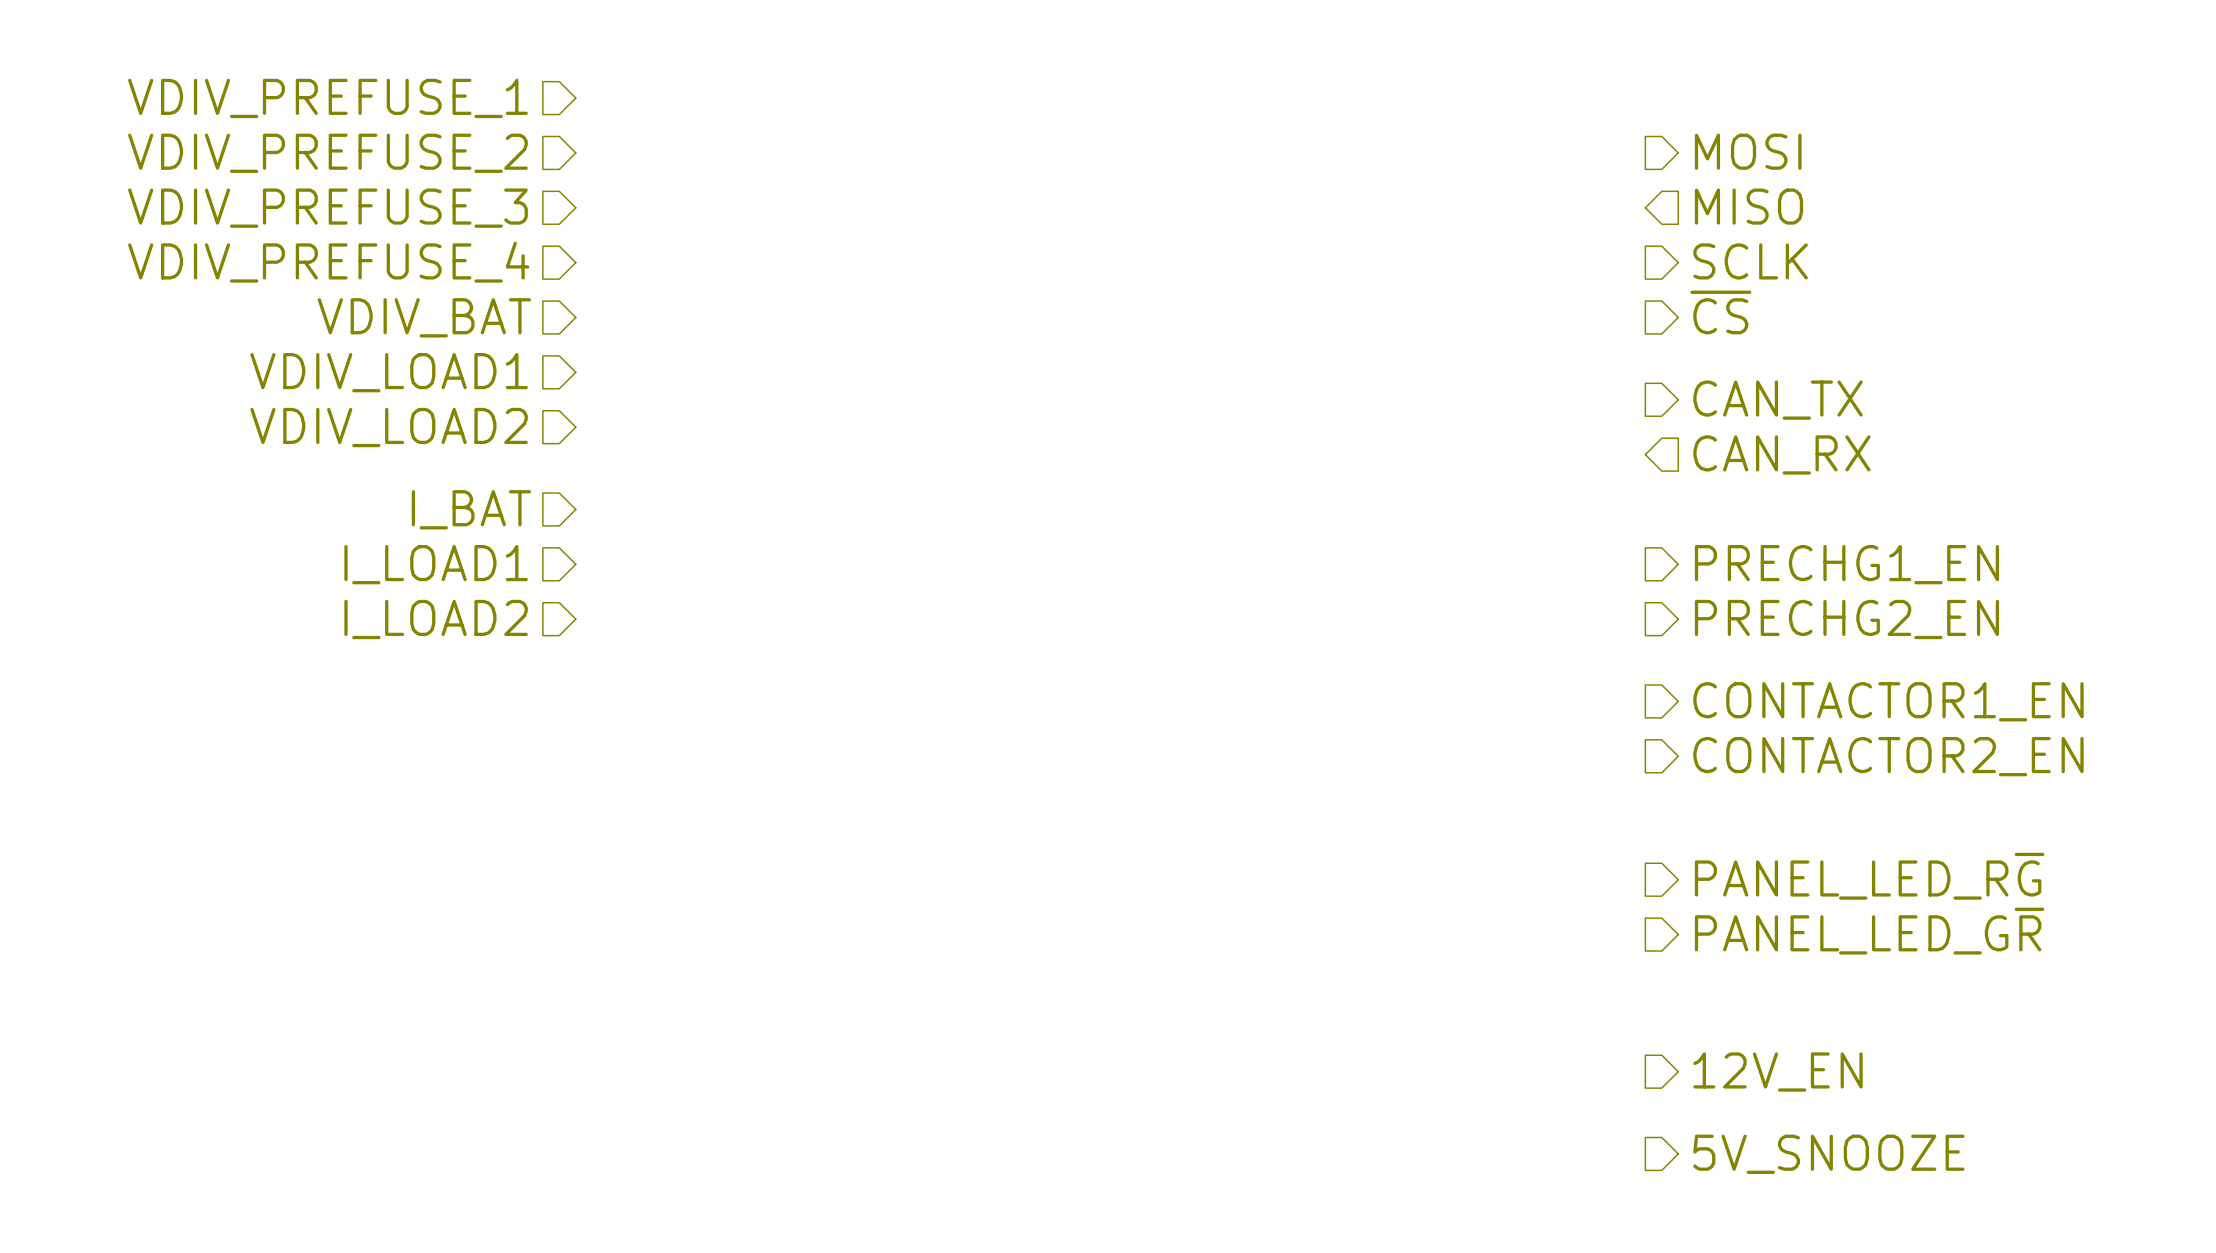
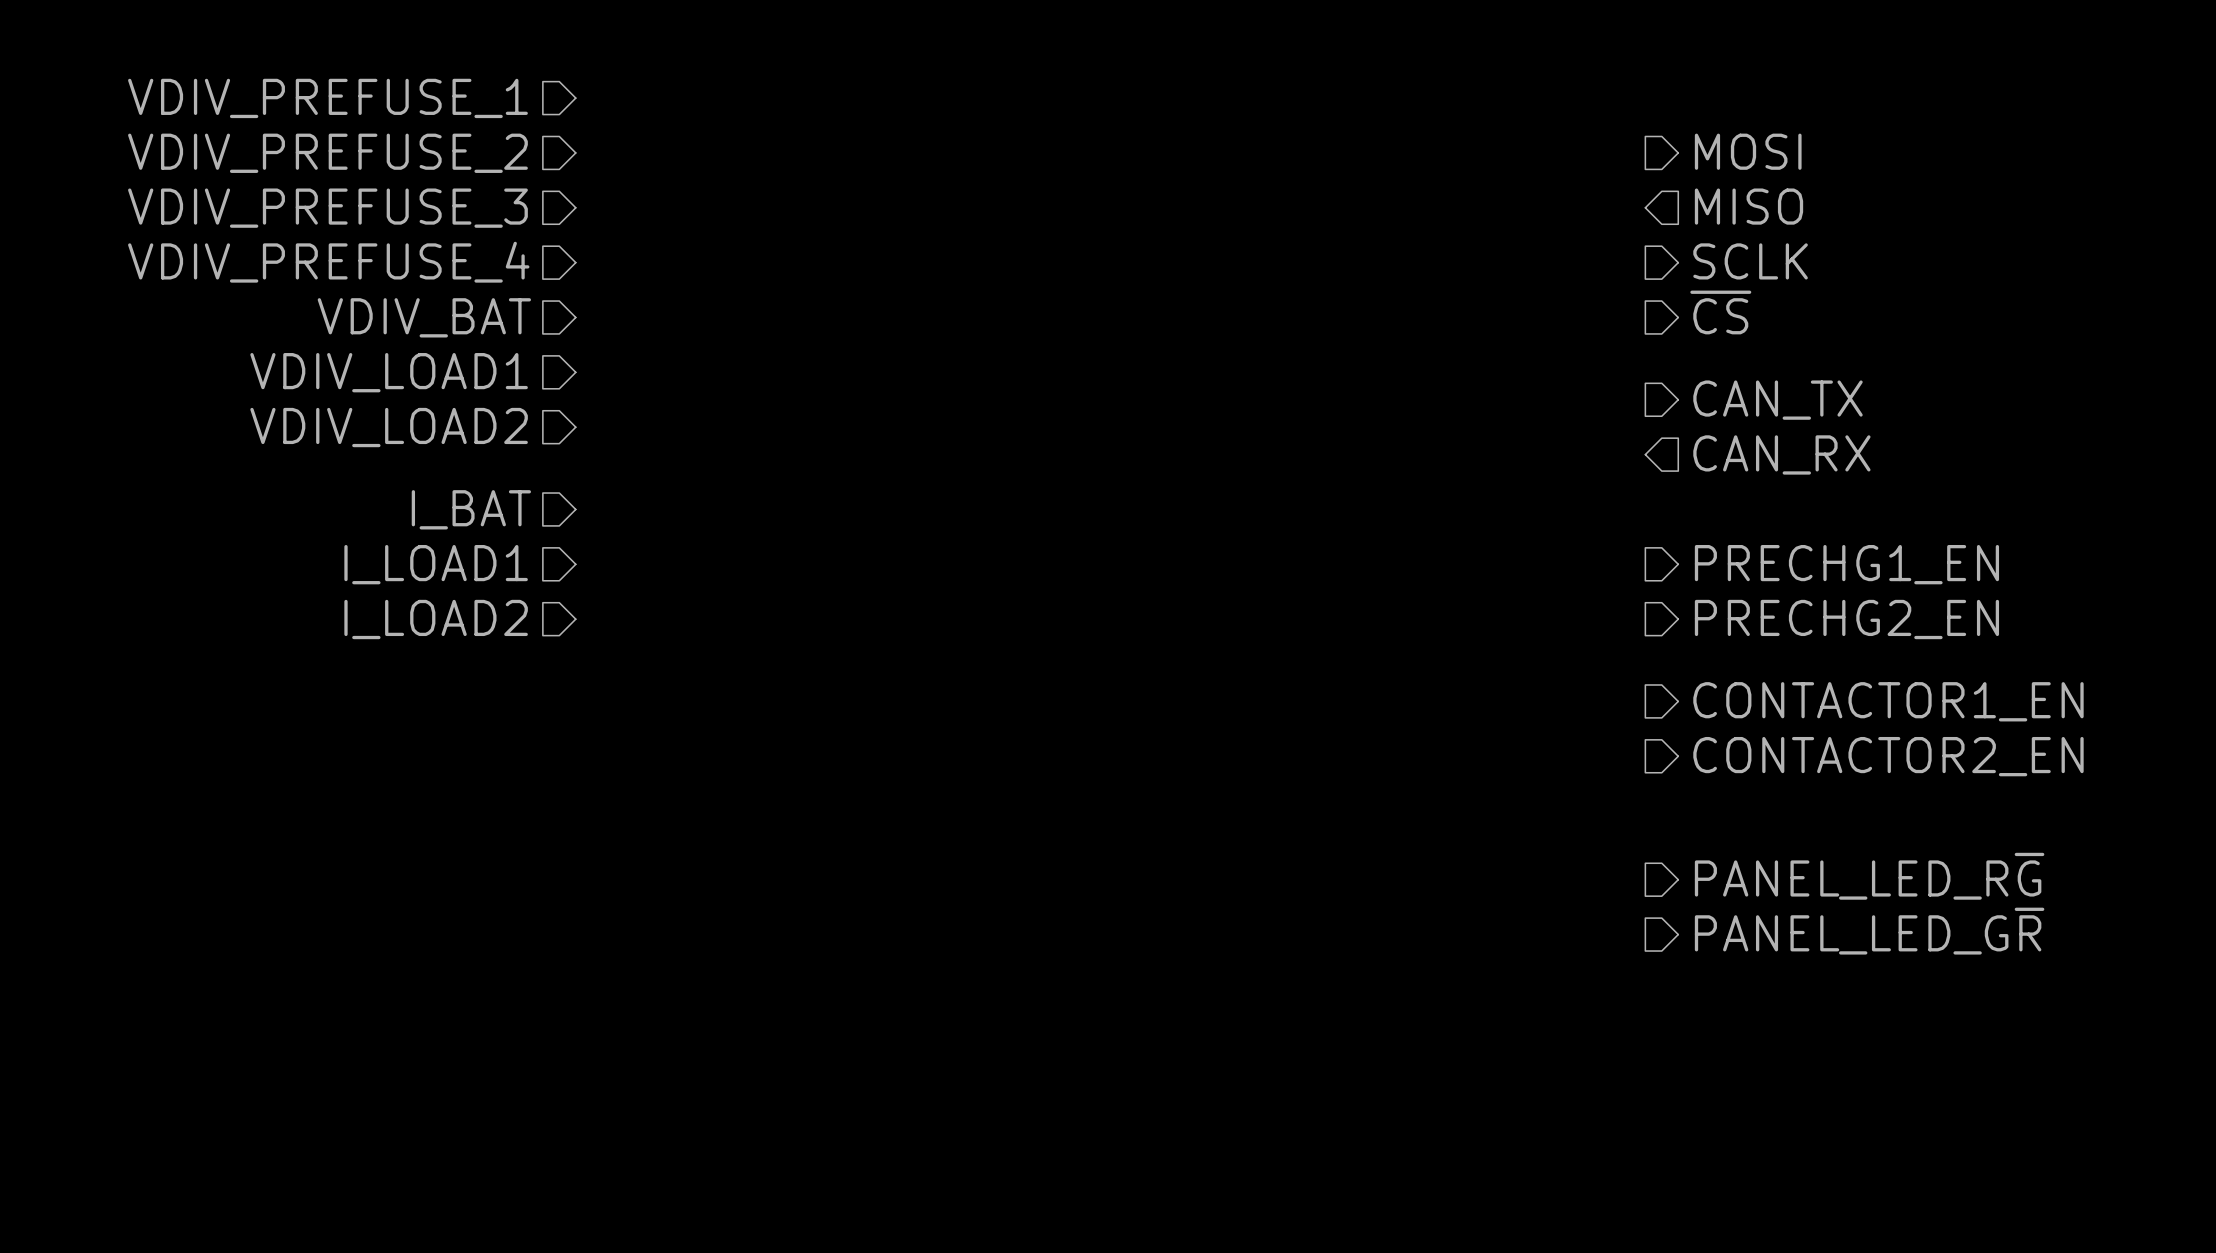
hierarchical label: 12V_EN (1777, 1072) -> none
hierarchical label: 5V_SNOOZE (1828, 1154) -> none

